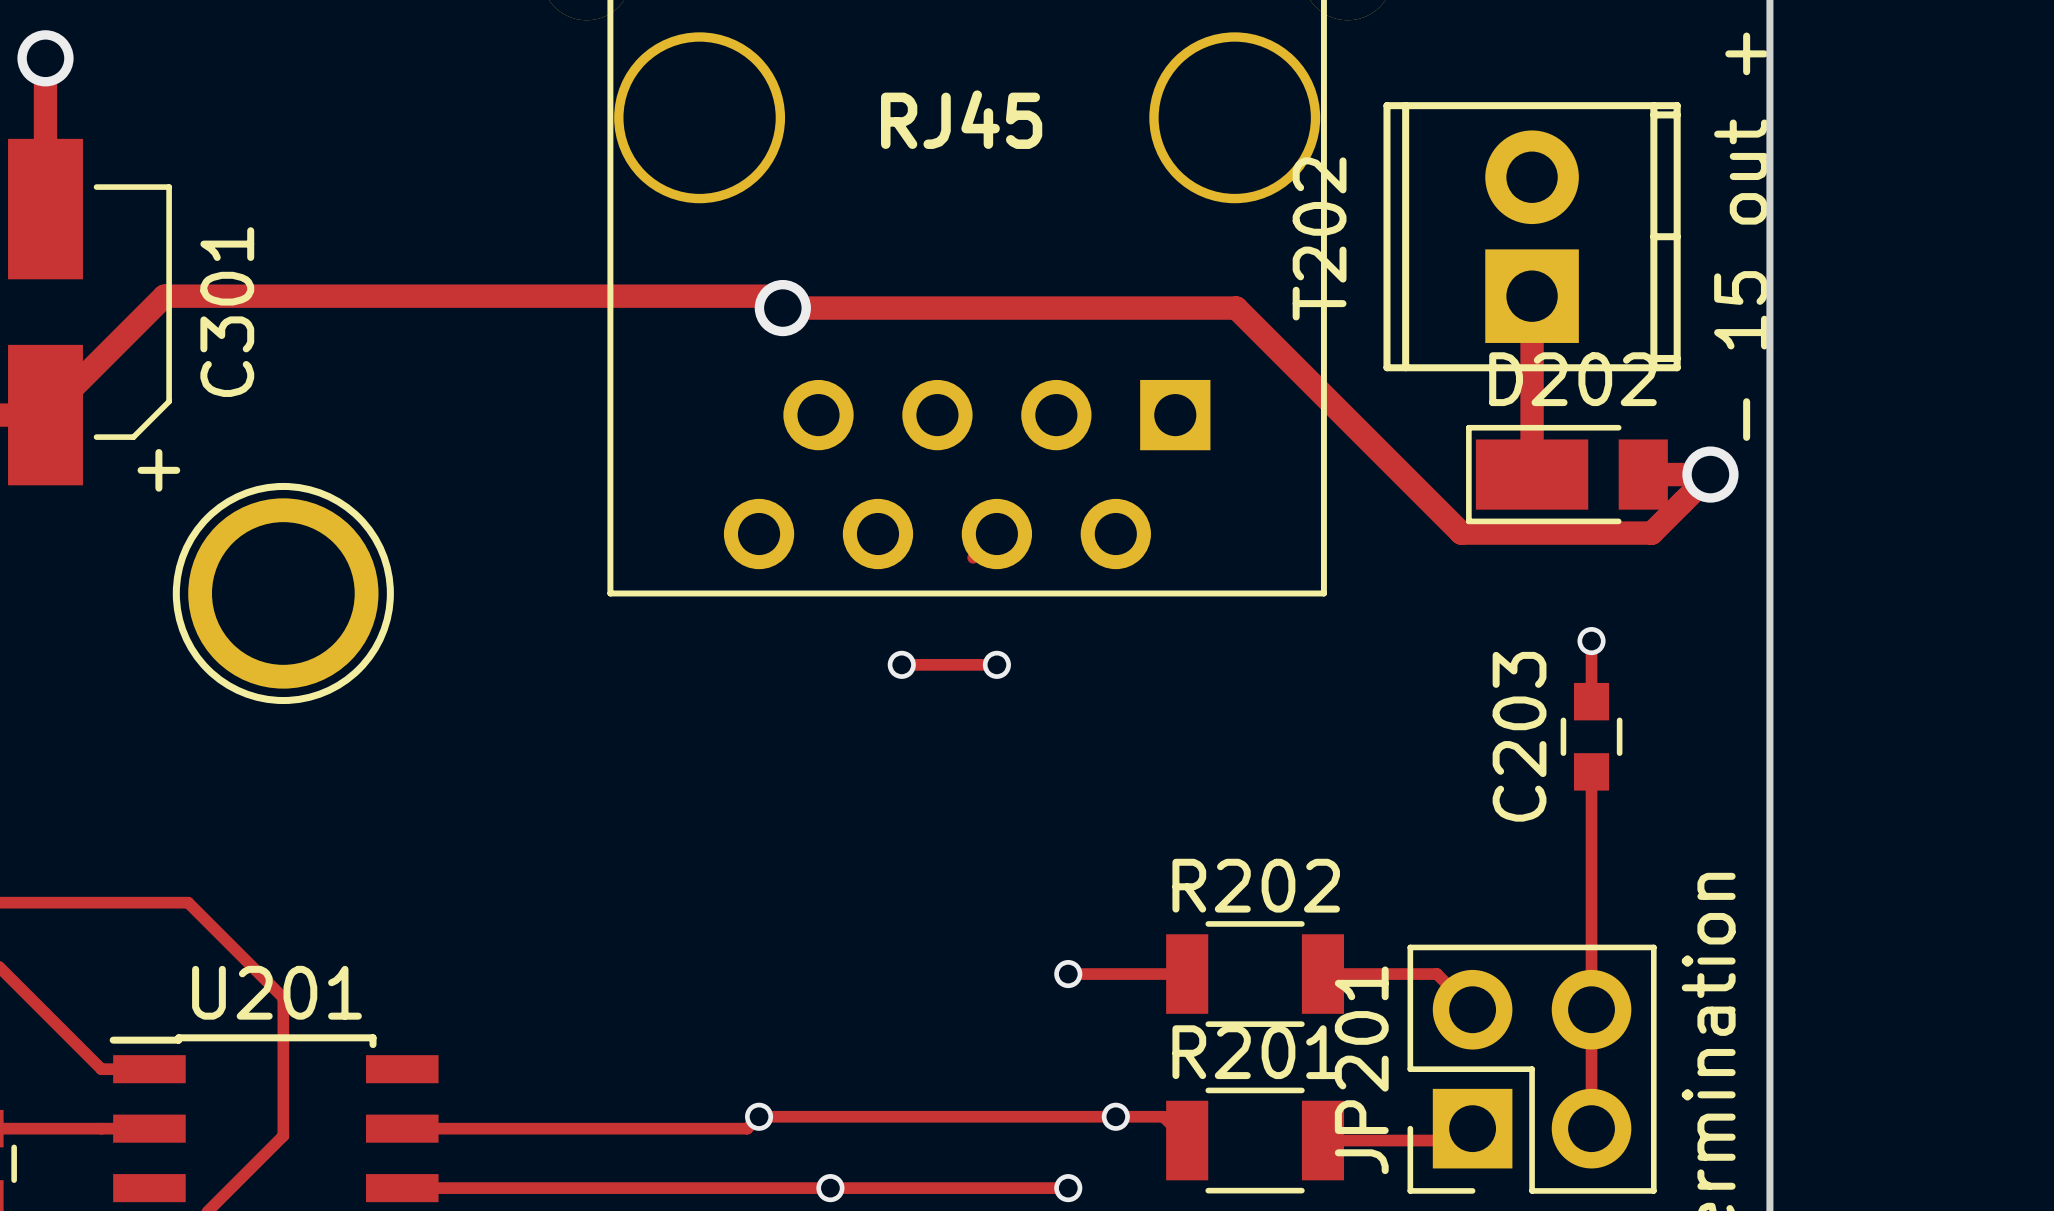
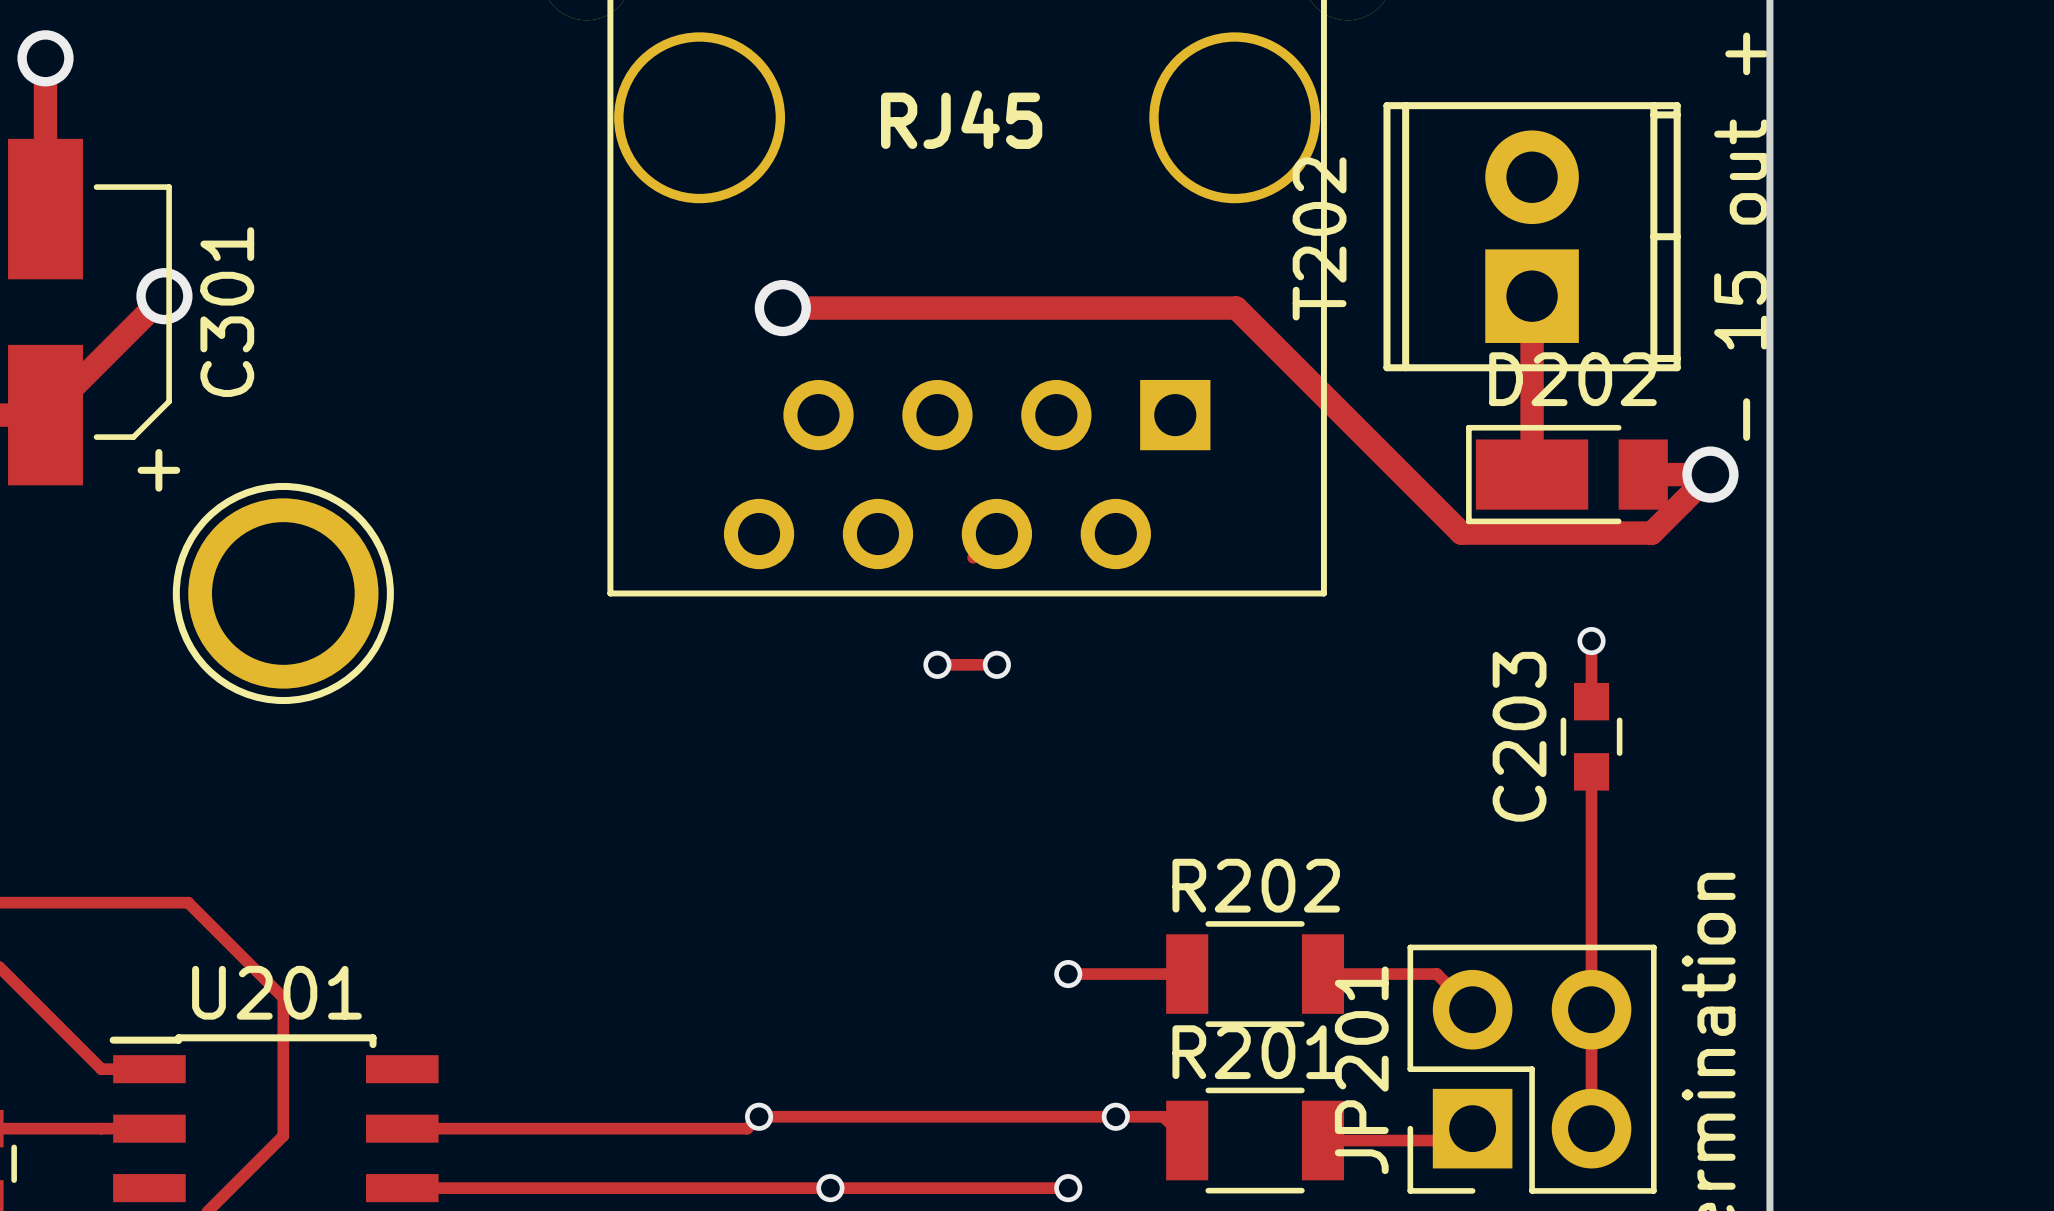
track: (164, 296) (770, 296) -> none
via: none -> (164, 296)
track: (901, 664) (937, 664) -> none
via position: (901, 664) -> (937, 664)

